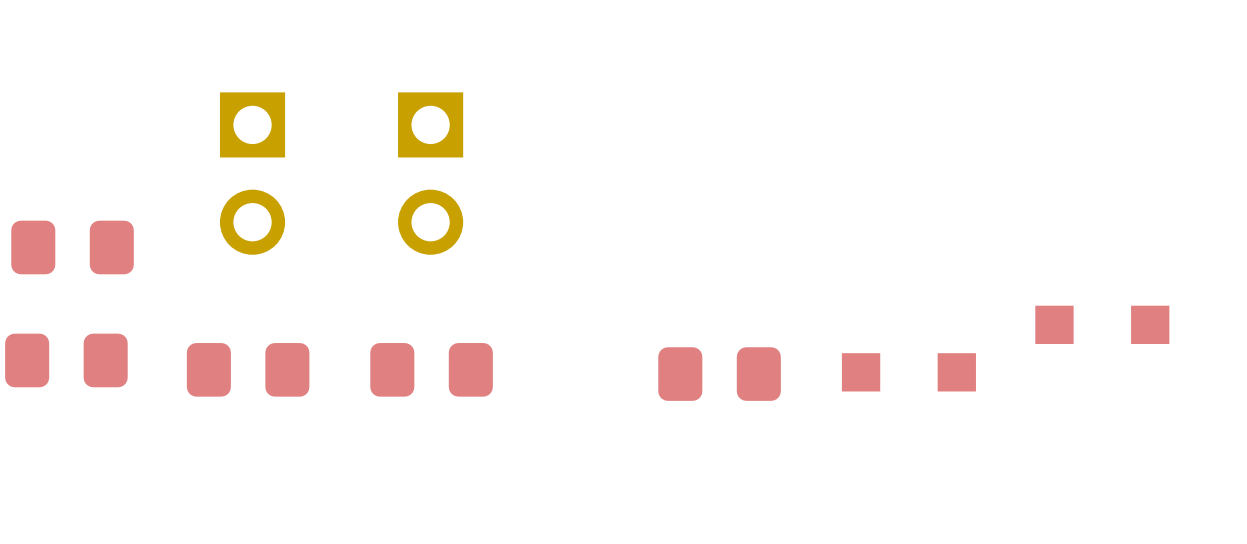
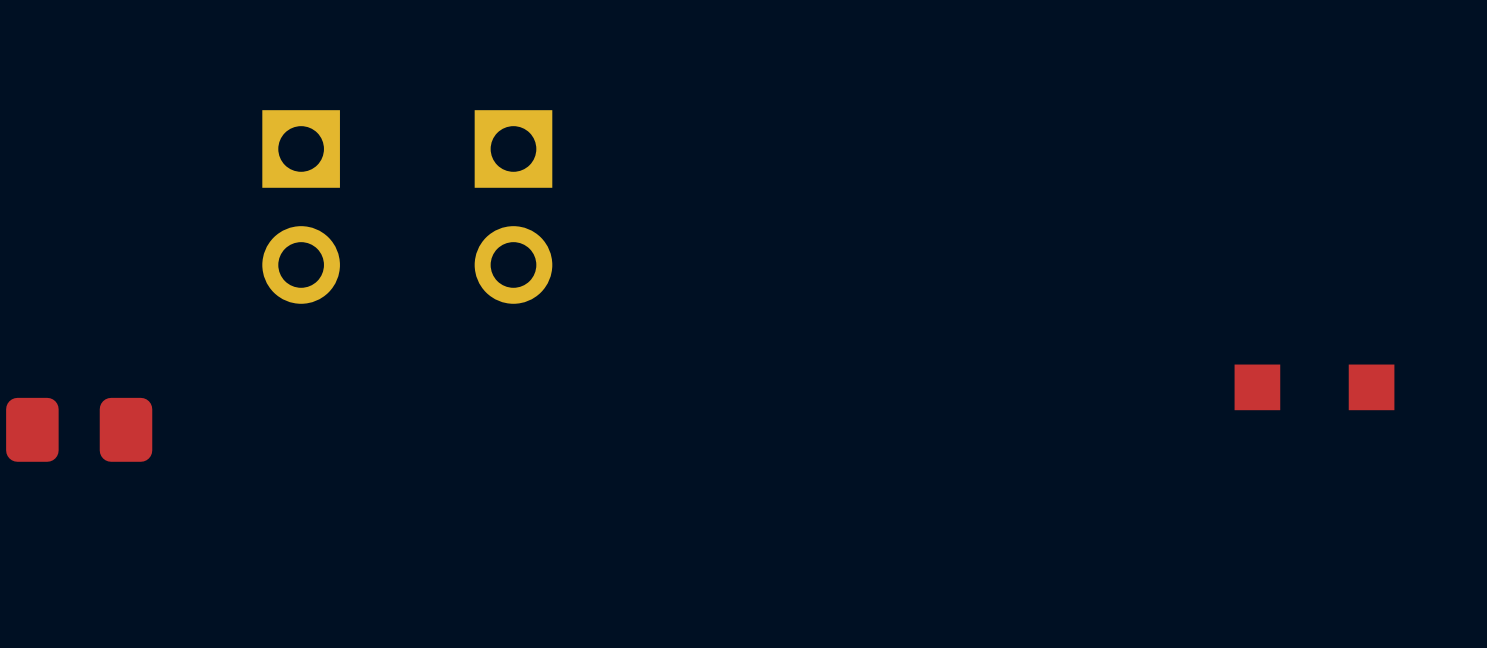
part: (72, 247) -> none
part: (248, 369) -> none
part: (431, 369) -> none
part: (908, 372) -> none
part: (719, 374) -> none

